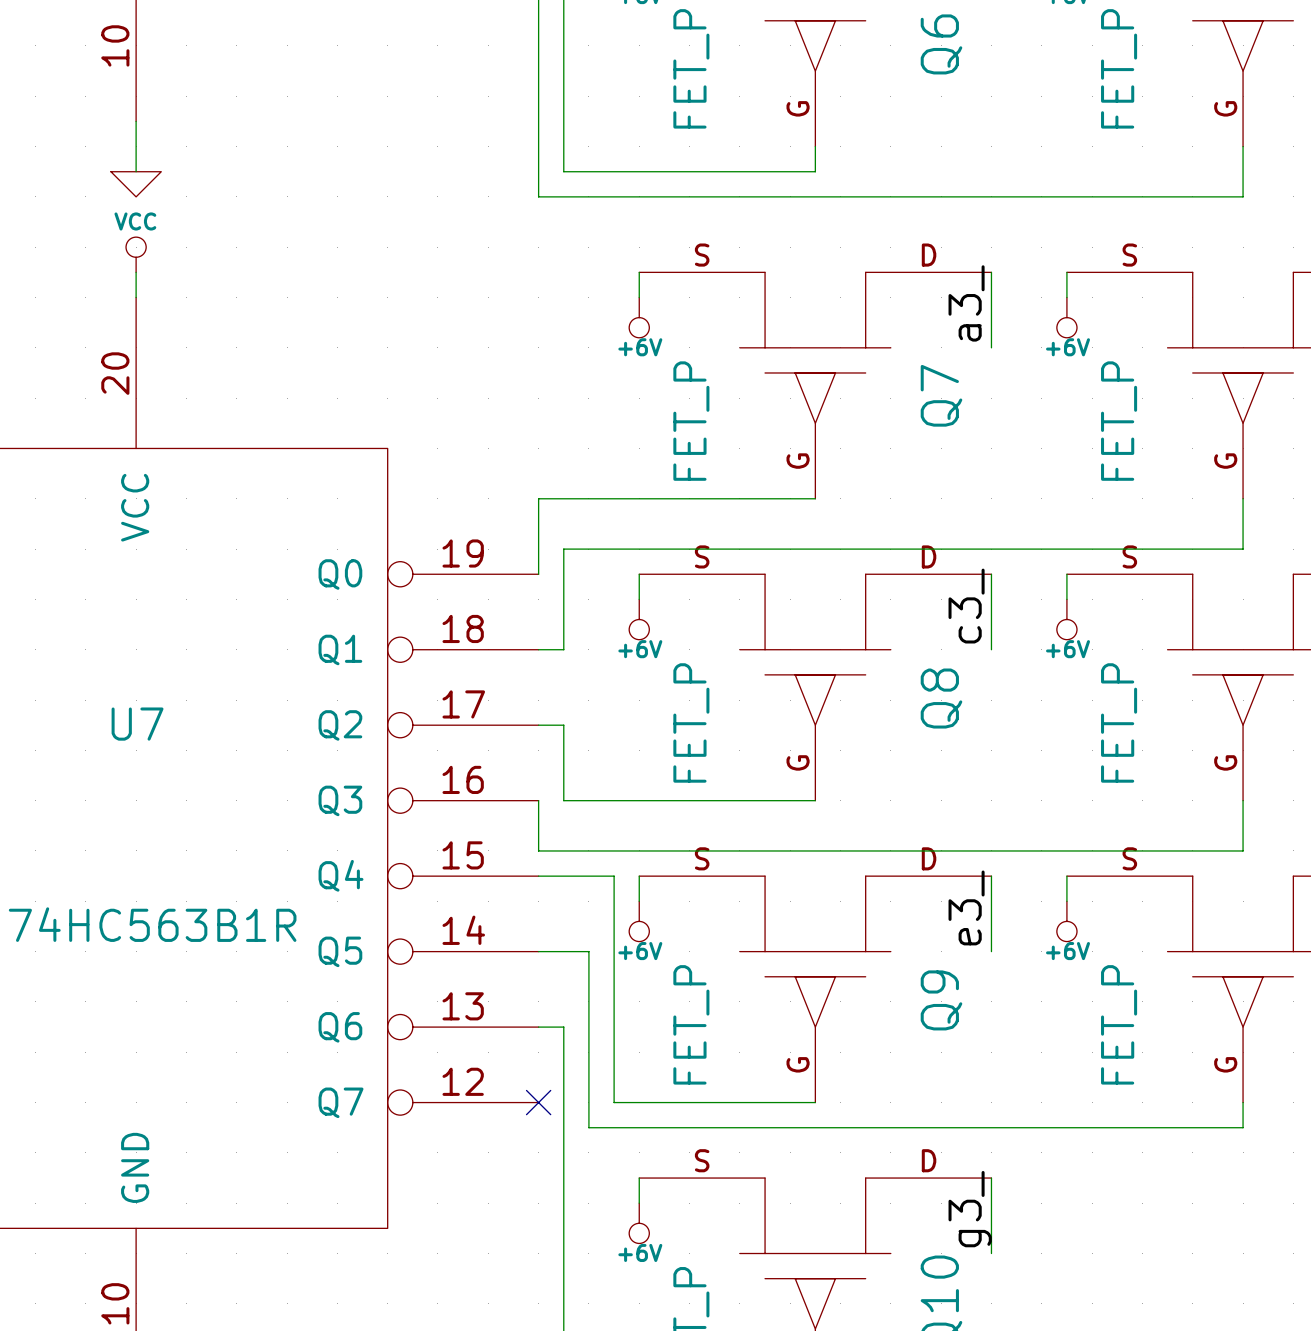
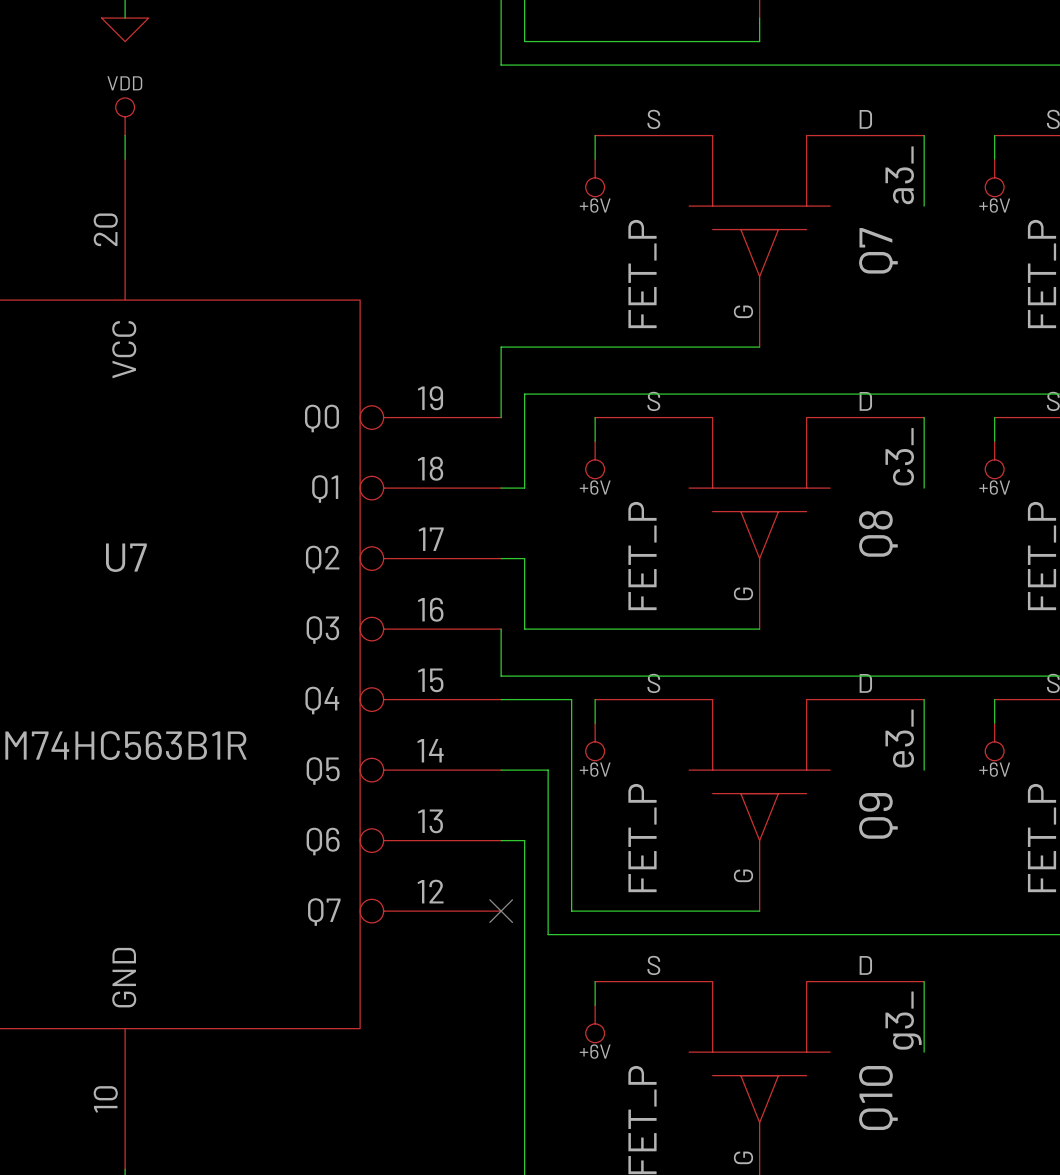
wire: (136, 146) (136, 171) -> none
power symbol position: (136, 184) -> (125, 29)
power symbol: VCC (136, 254) -> VDD (125, 116)

